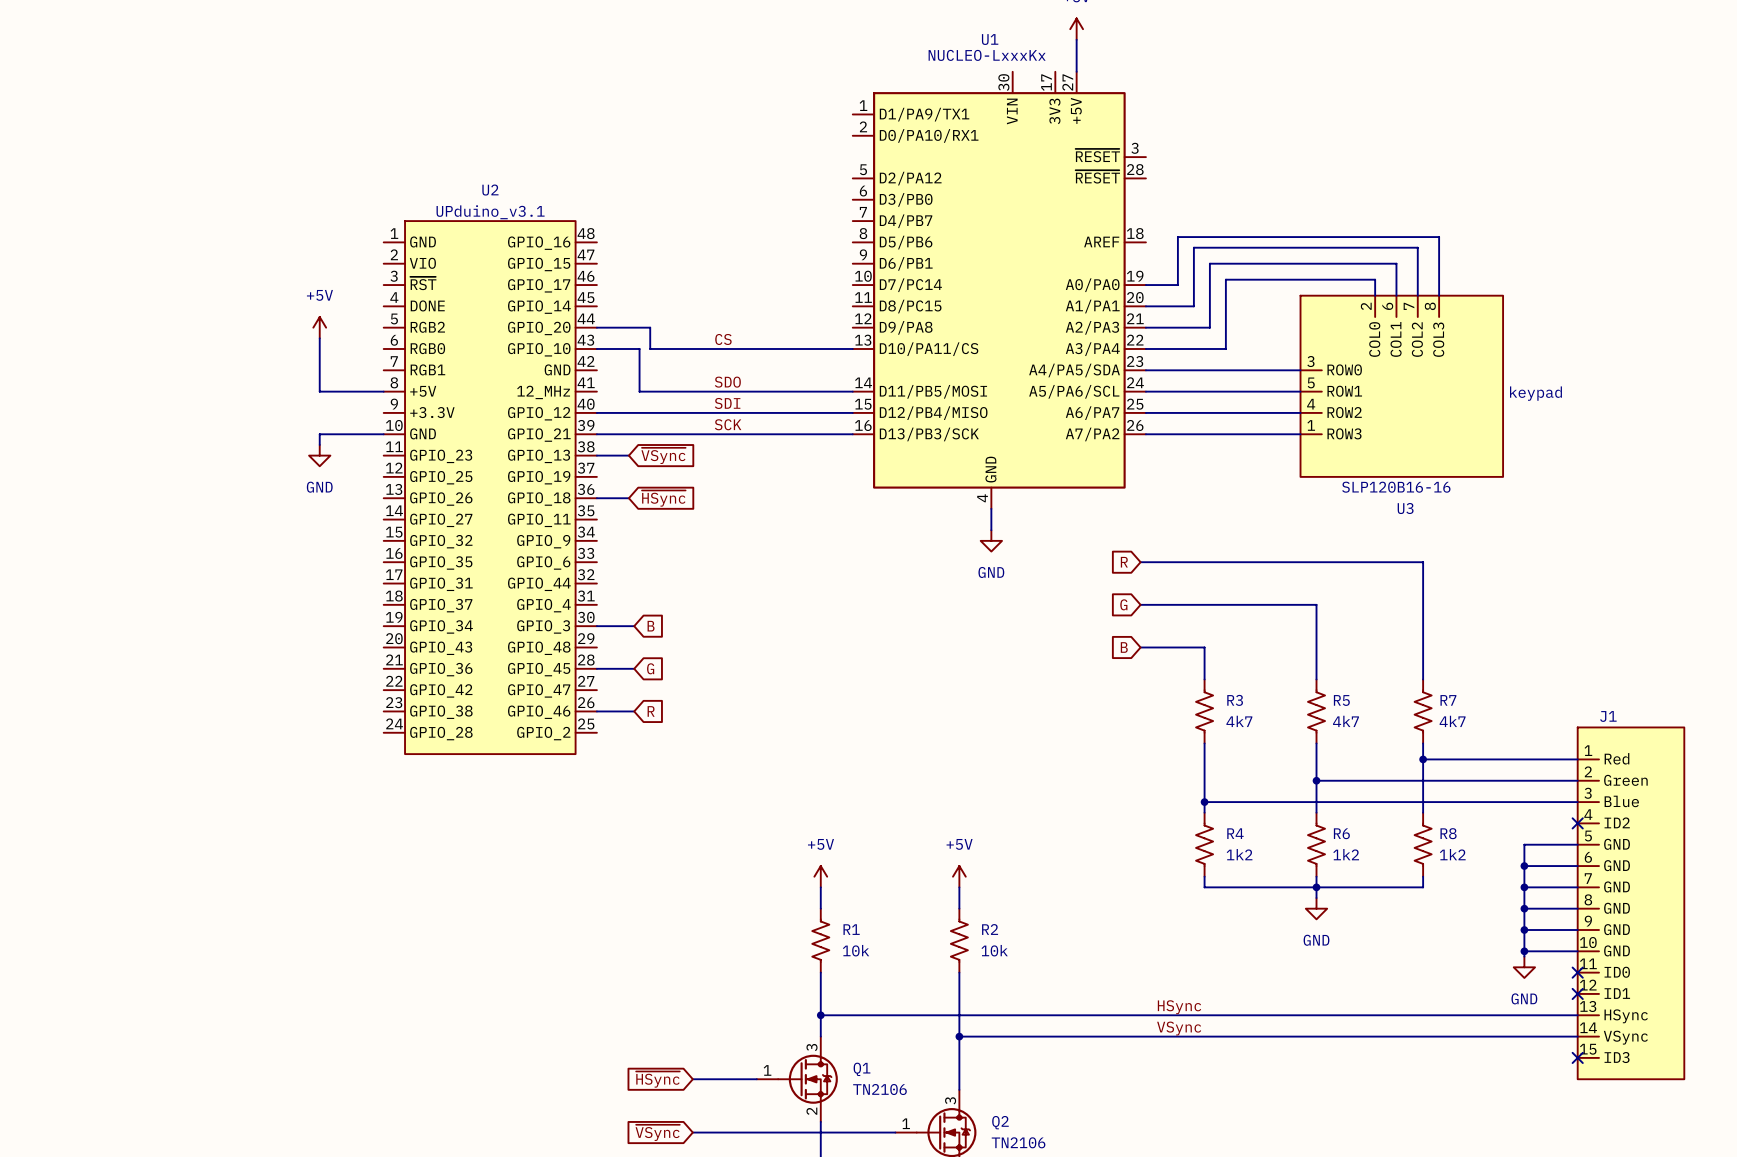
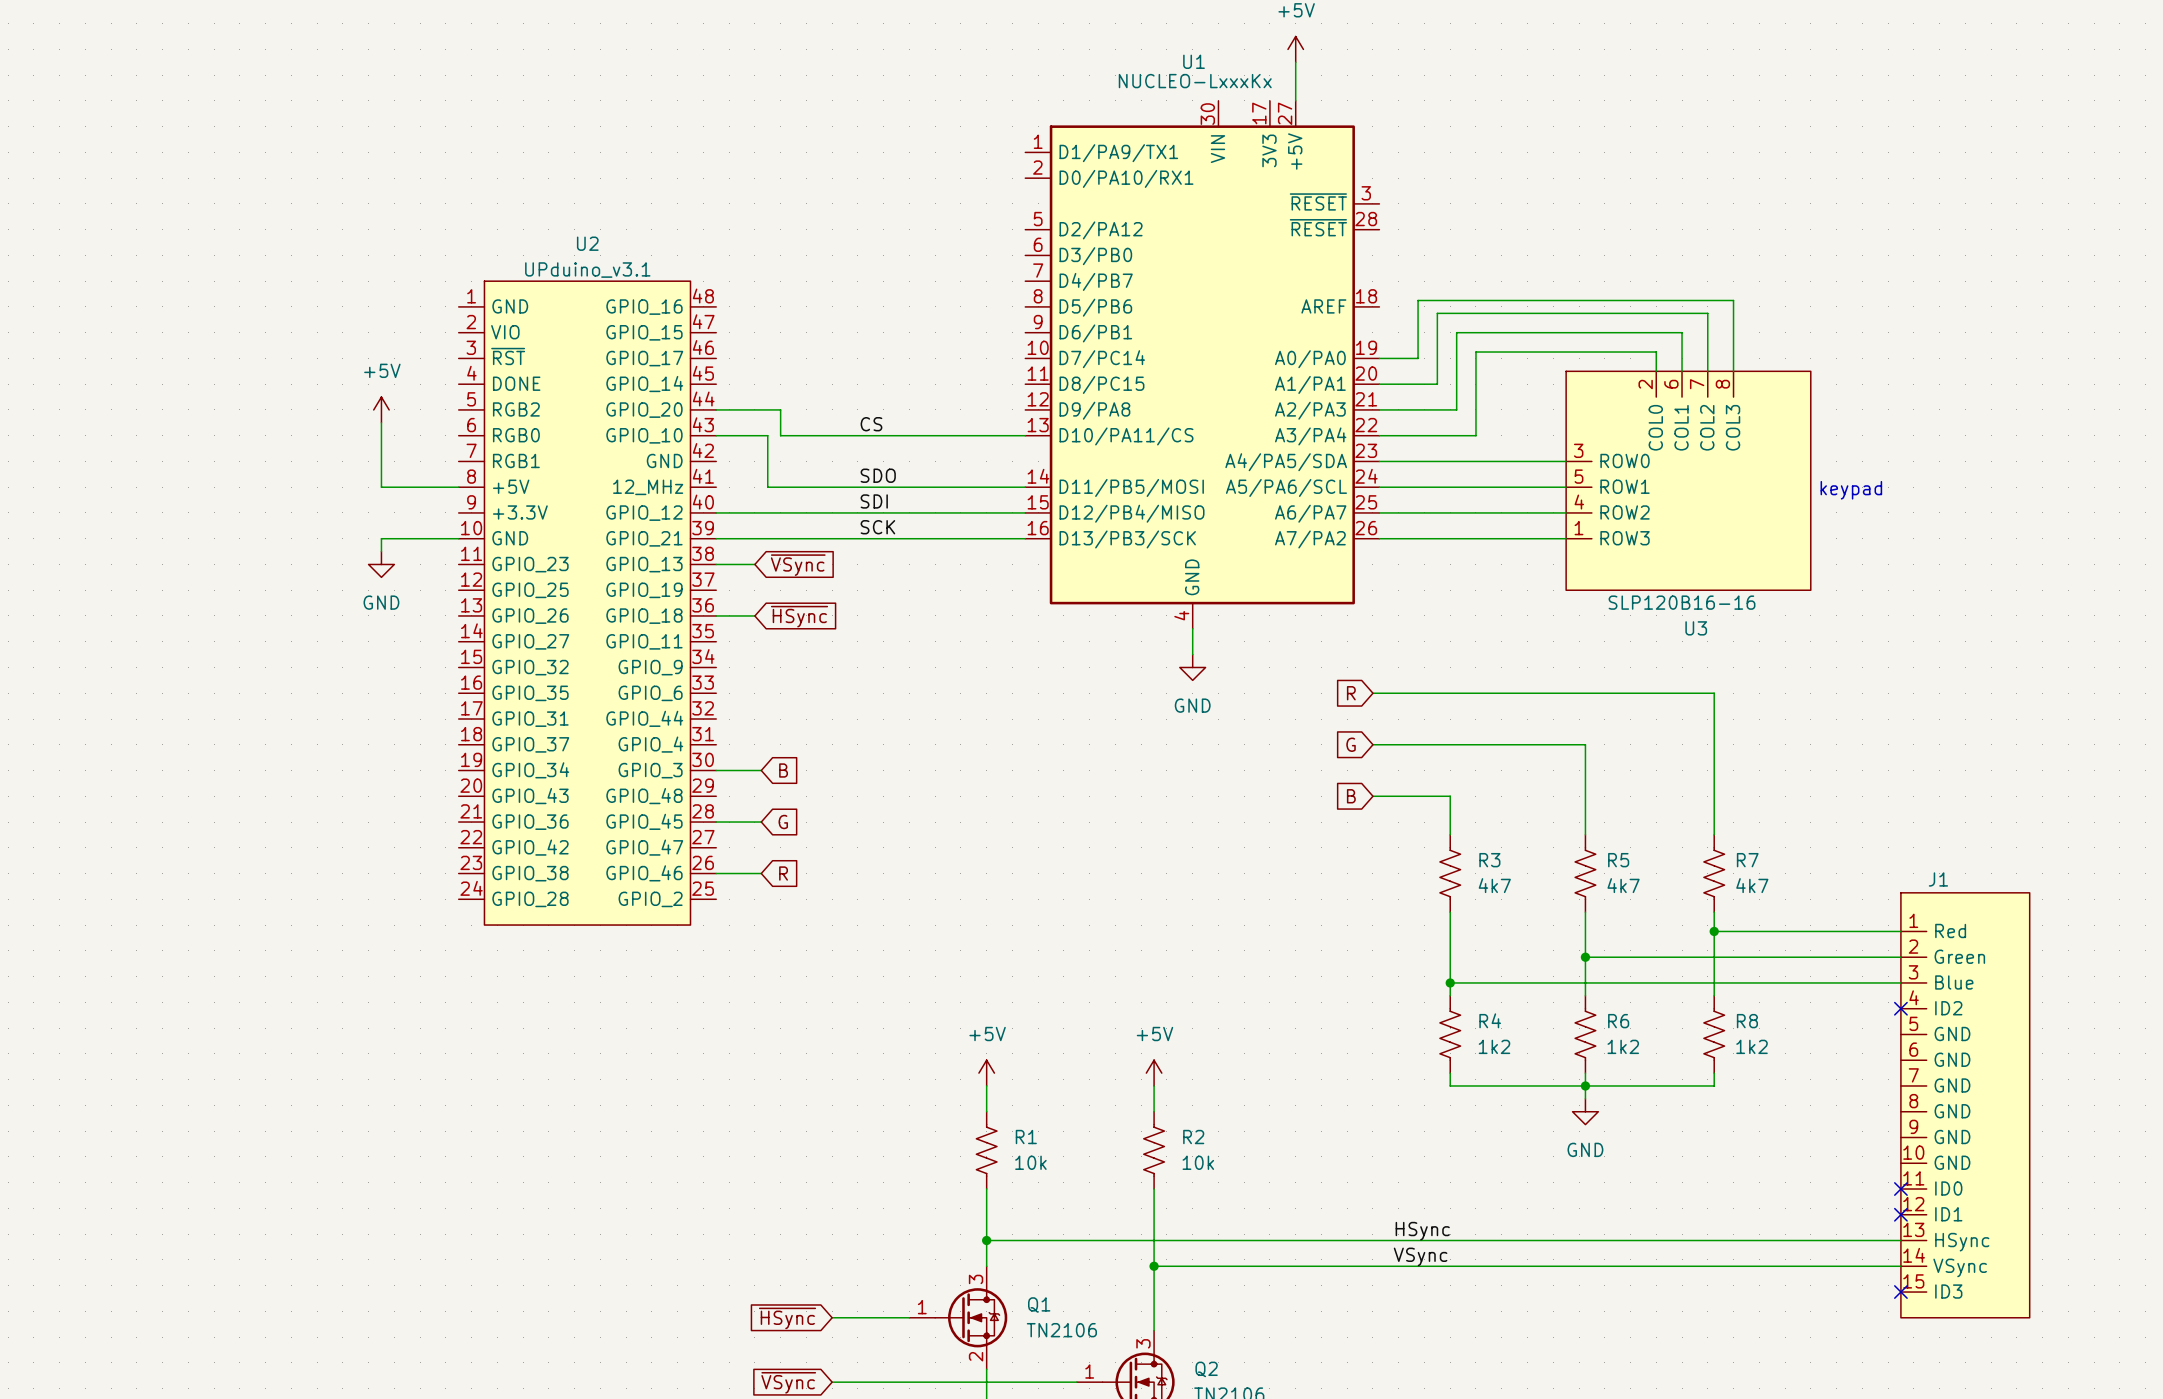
wire: (1577, 844) (1524, 844) (1524, 956) -> none
wire: (1524, 866) (1577, 866) -> none
junction: (1524, 866) -> none
wire: (1524, 887) (1577, 887) -> none
junction: (1524, 887) -> none
wire: (1524, 908) (1577, 908) -> none
junction: (1524, 908) -> none
wire: (1524, 930) (1577, 930) -> none
junction: (1524, 930) -> none
wire: (1524, 951) (1577, 951) -> none
junction: (1524, 951) -> none
power symbol: GND (1524, 967) -> none

